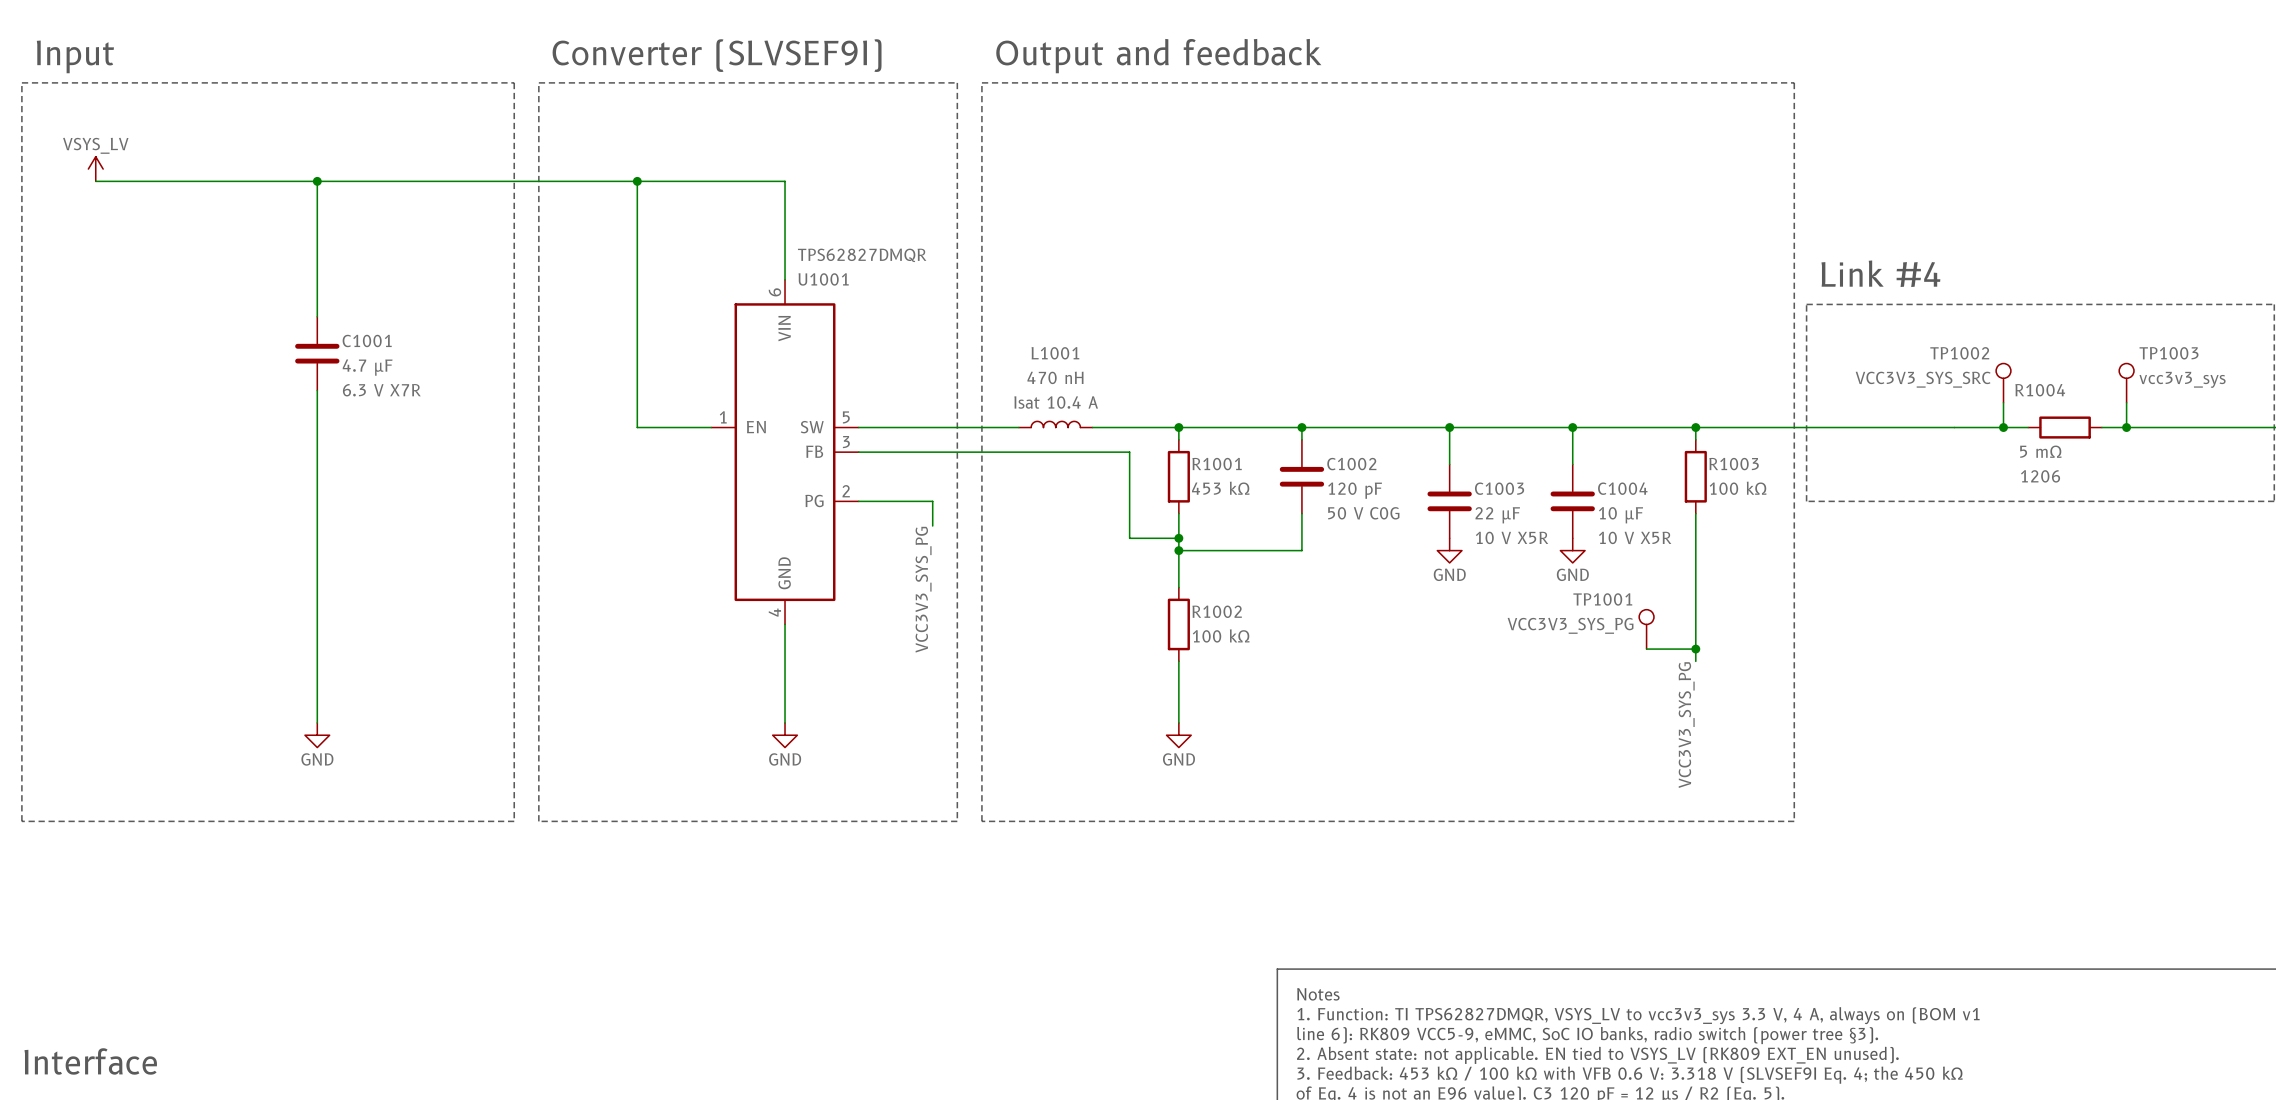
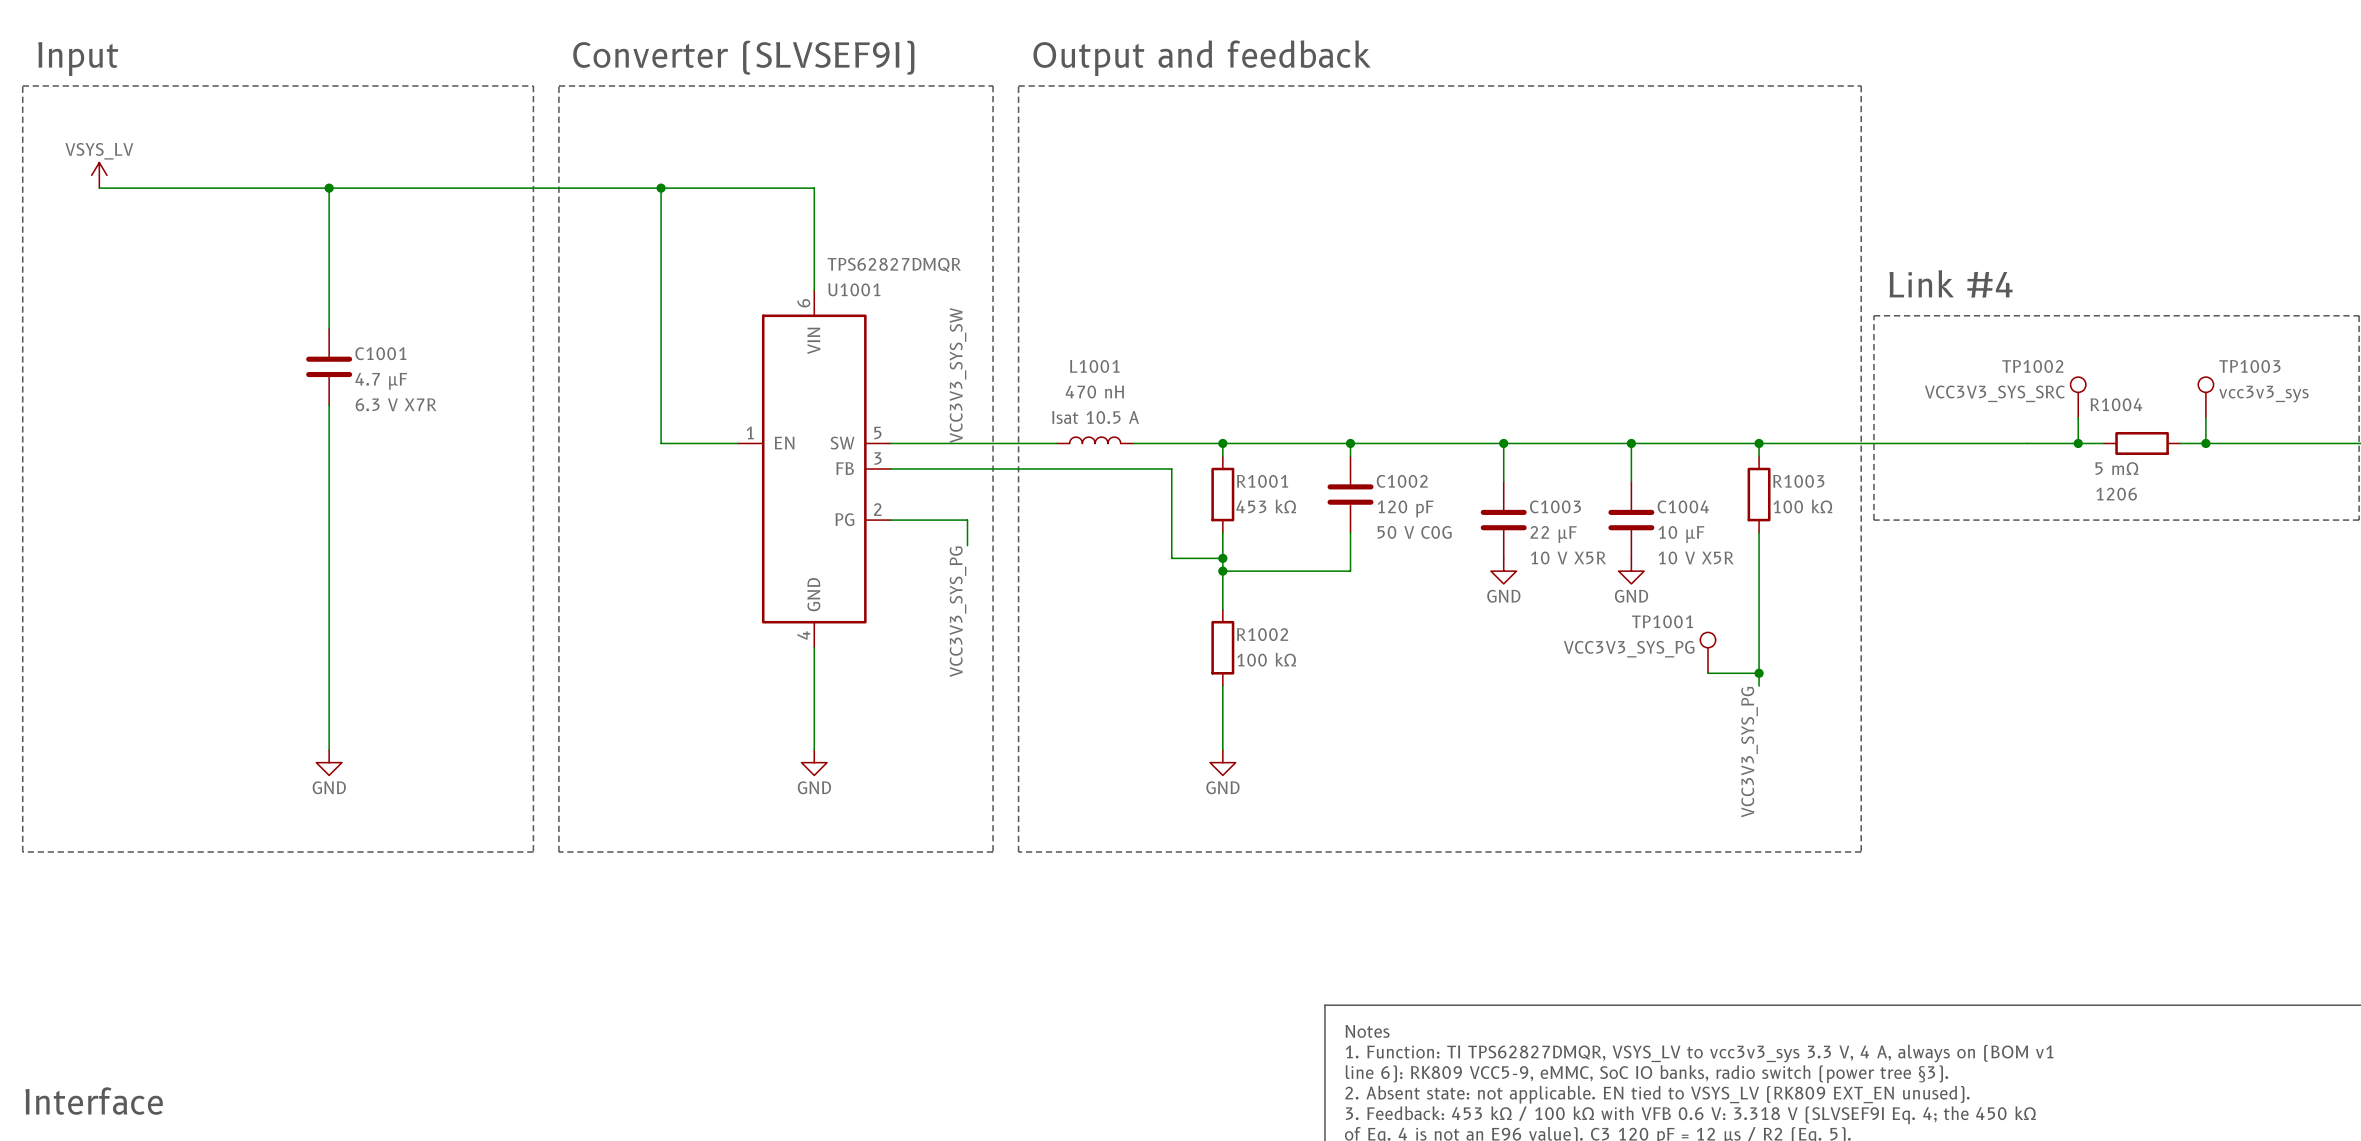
label: none -> VCC3V3_SYS_SW (958, 375)
L1001 text: Isat 10.4 A (1056, 402) -> Isat 10.5 A (1095, 417)

